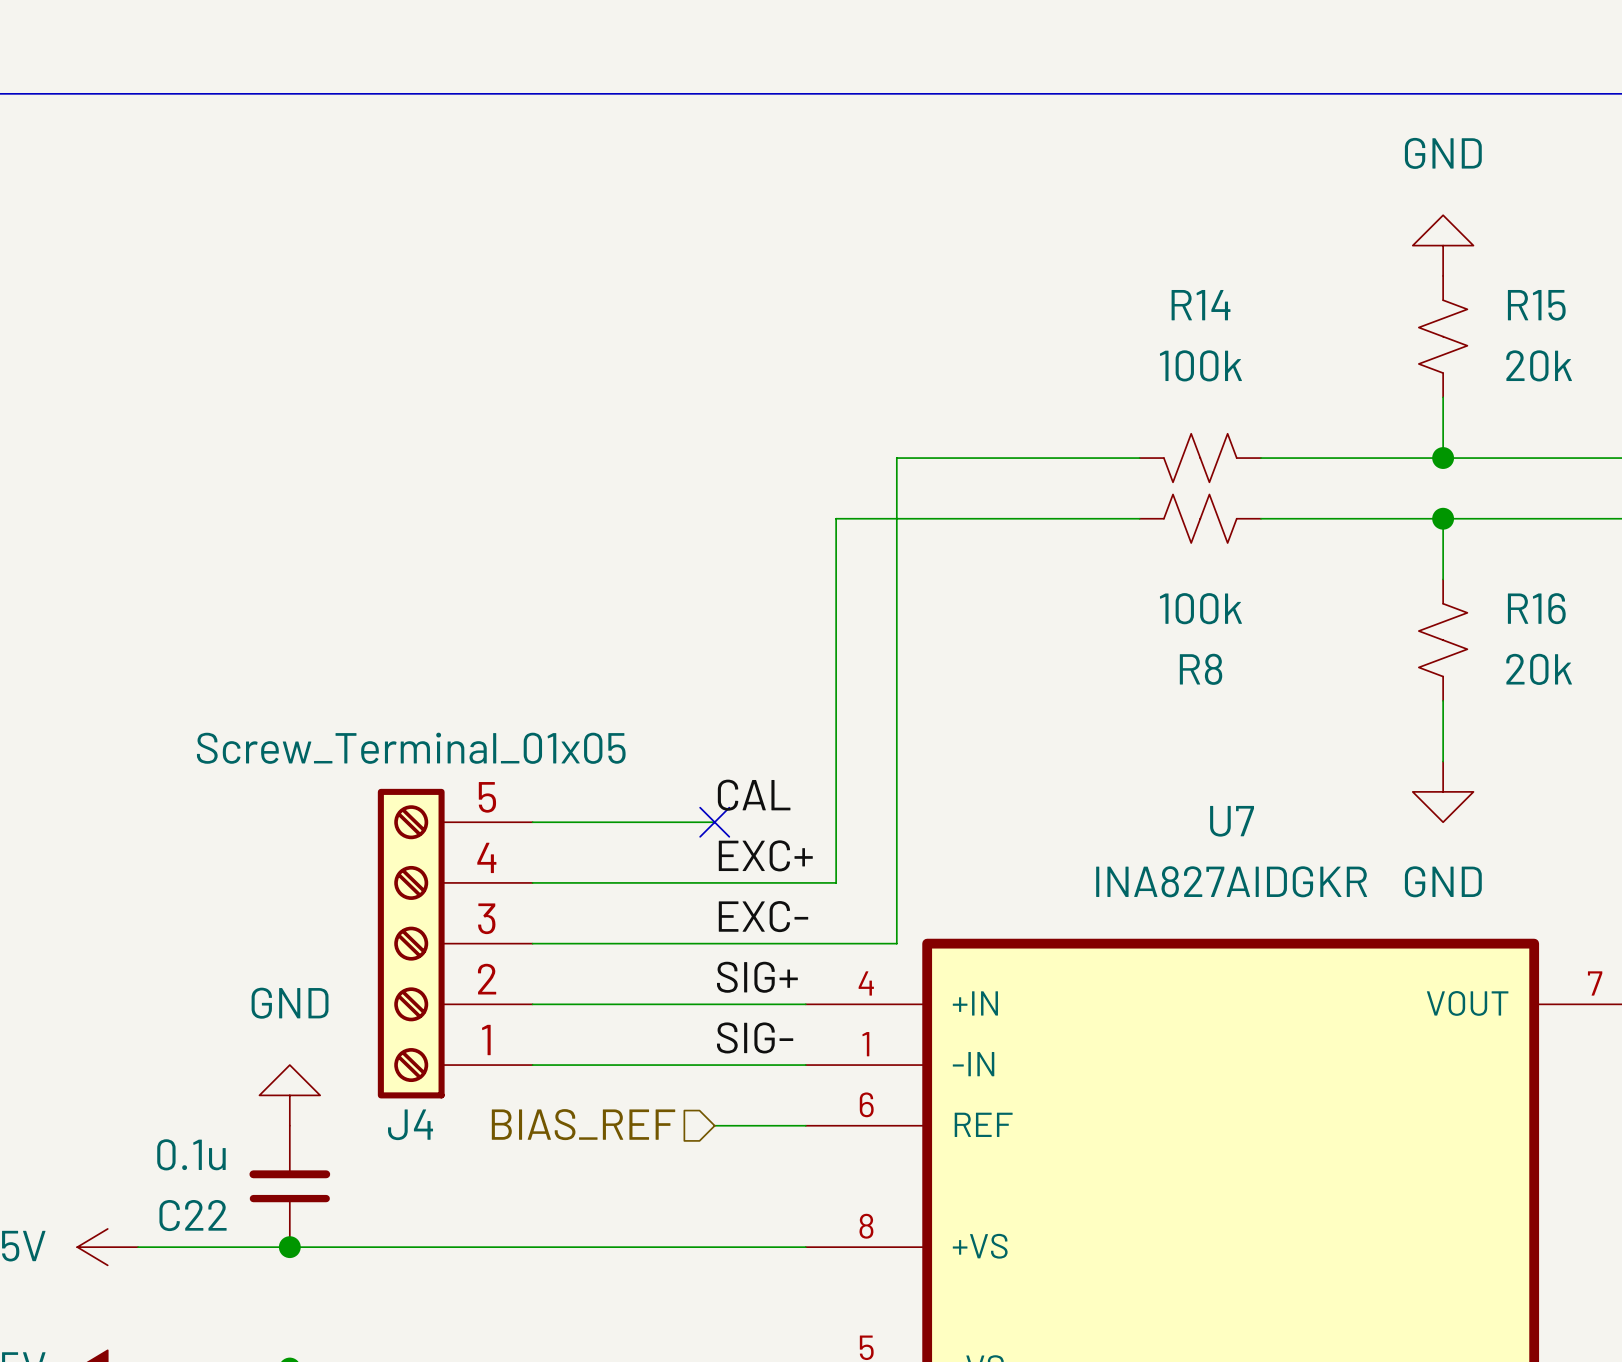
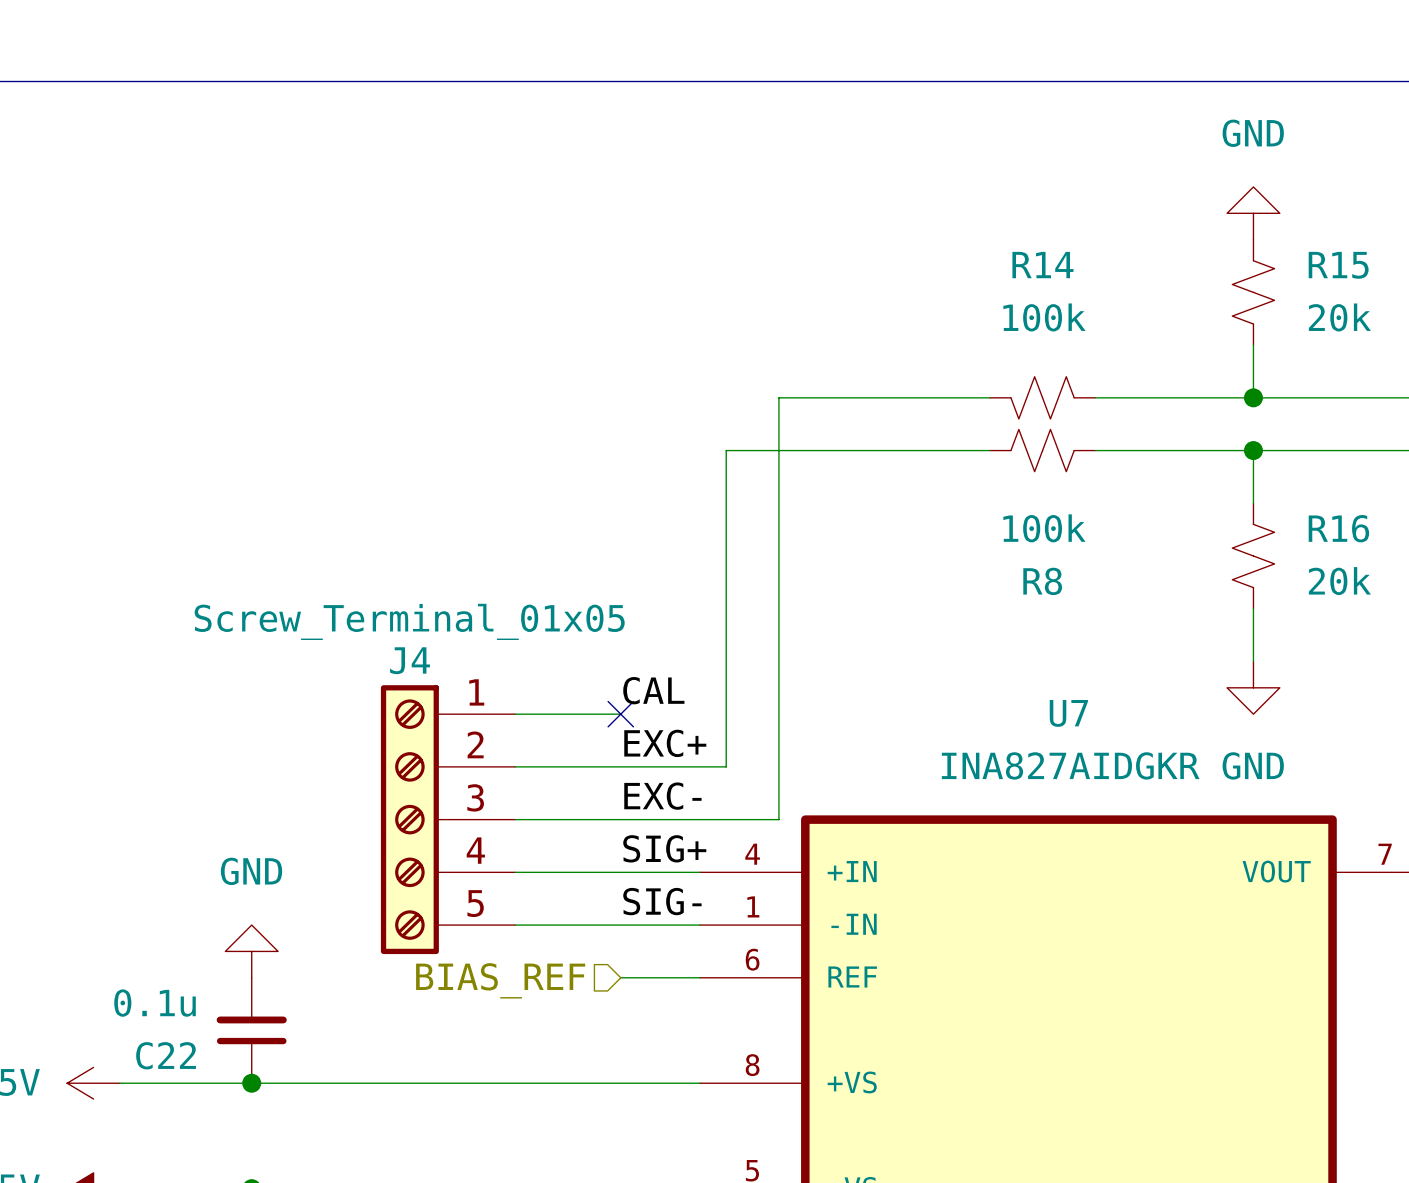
J4 flip: as is (411, 943) -> up-down (409, 819)

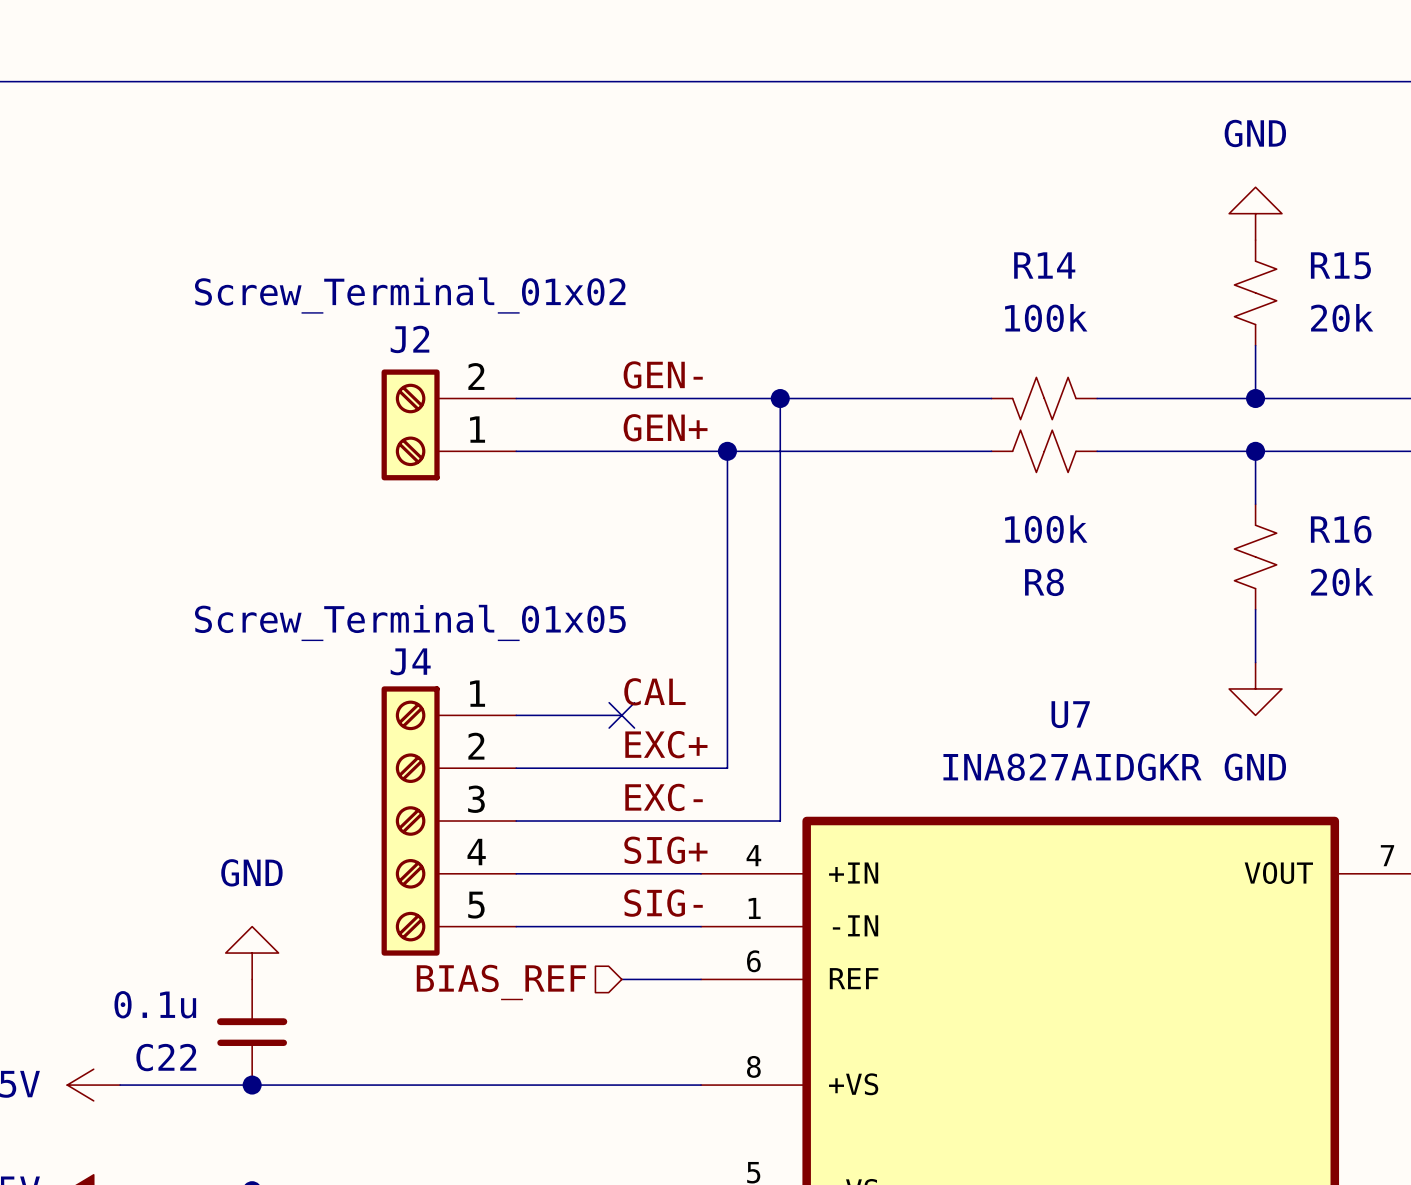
label: none -> GEN- (663, 374)
wire: none -> (516, 398) (780, 398)
junction: none -> (780, 398)
J2: none -> Screw_Terminal_01x02 (448, 424)
label: none -> GEN+ (665, 427)
wire: none -> (516, 451) (727, 451)
junction: none -> (727, 451)

